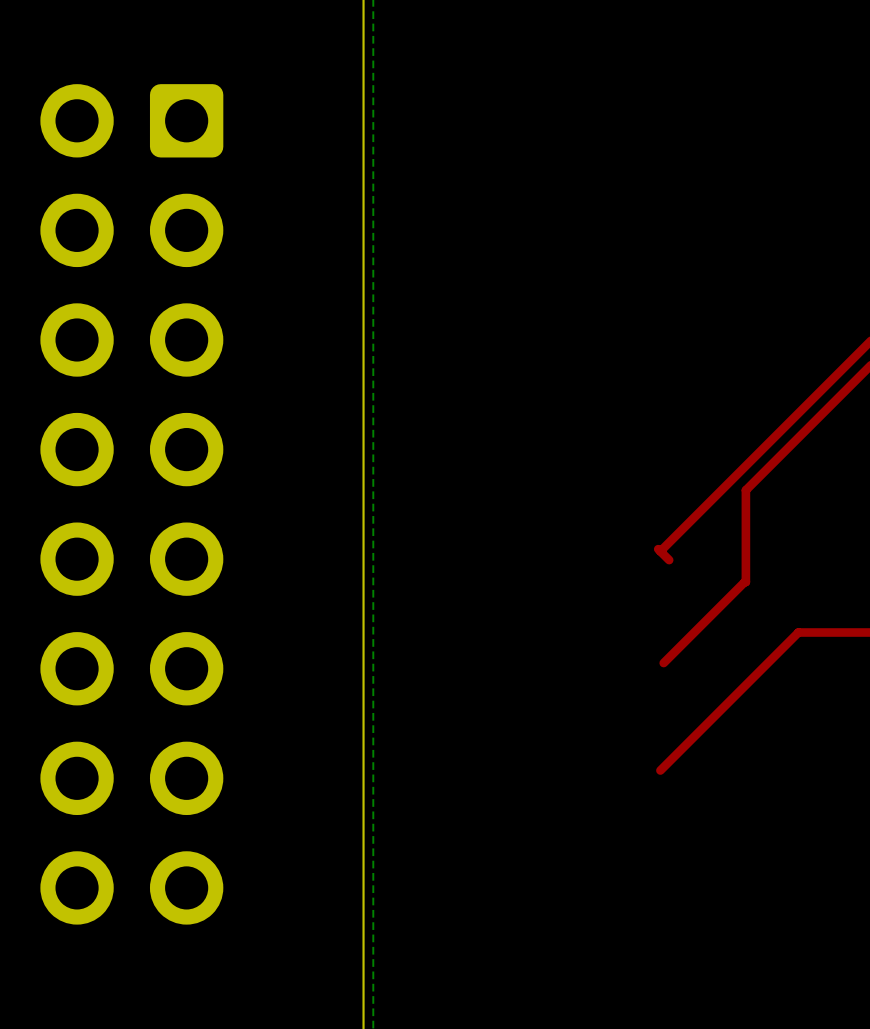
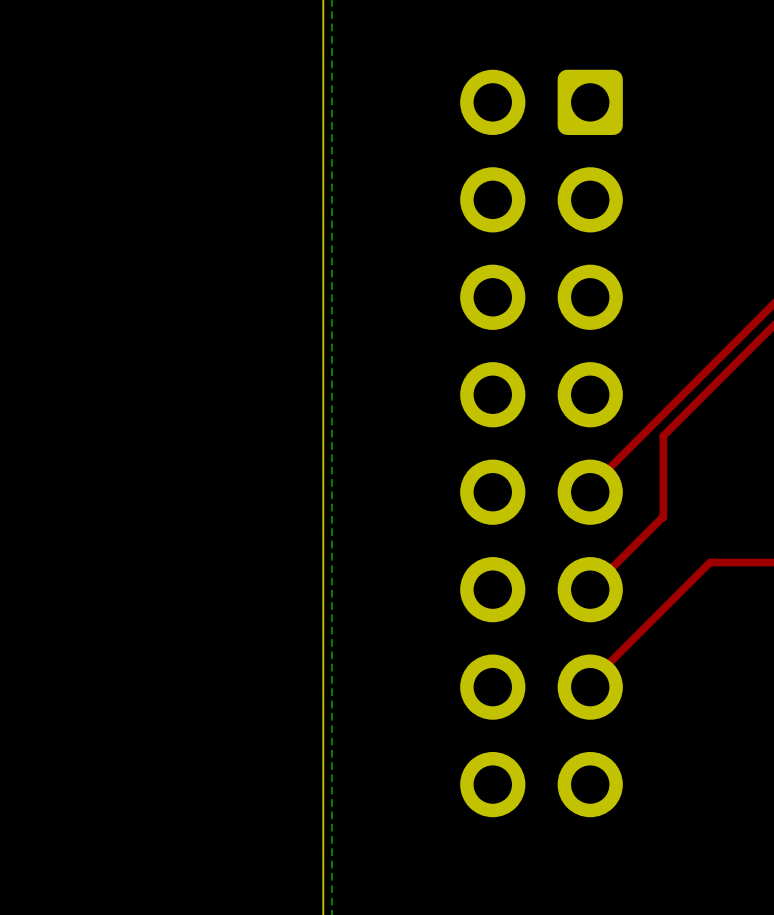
part position: (131, 504) -> (541, 443)

